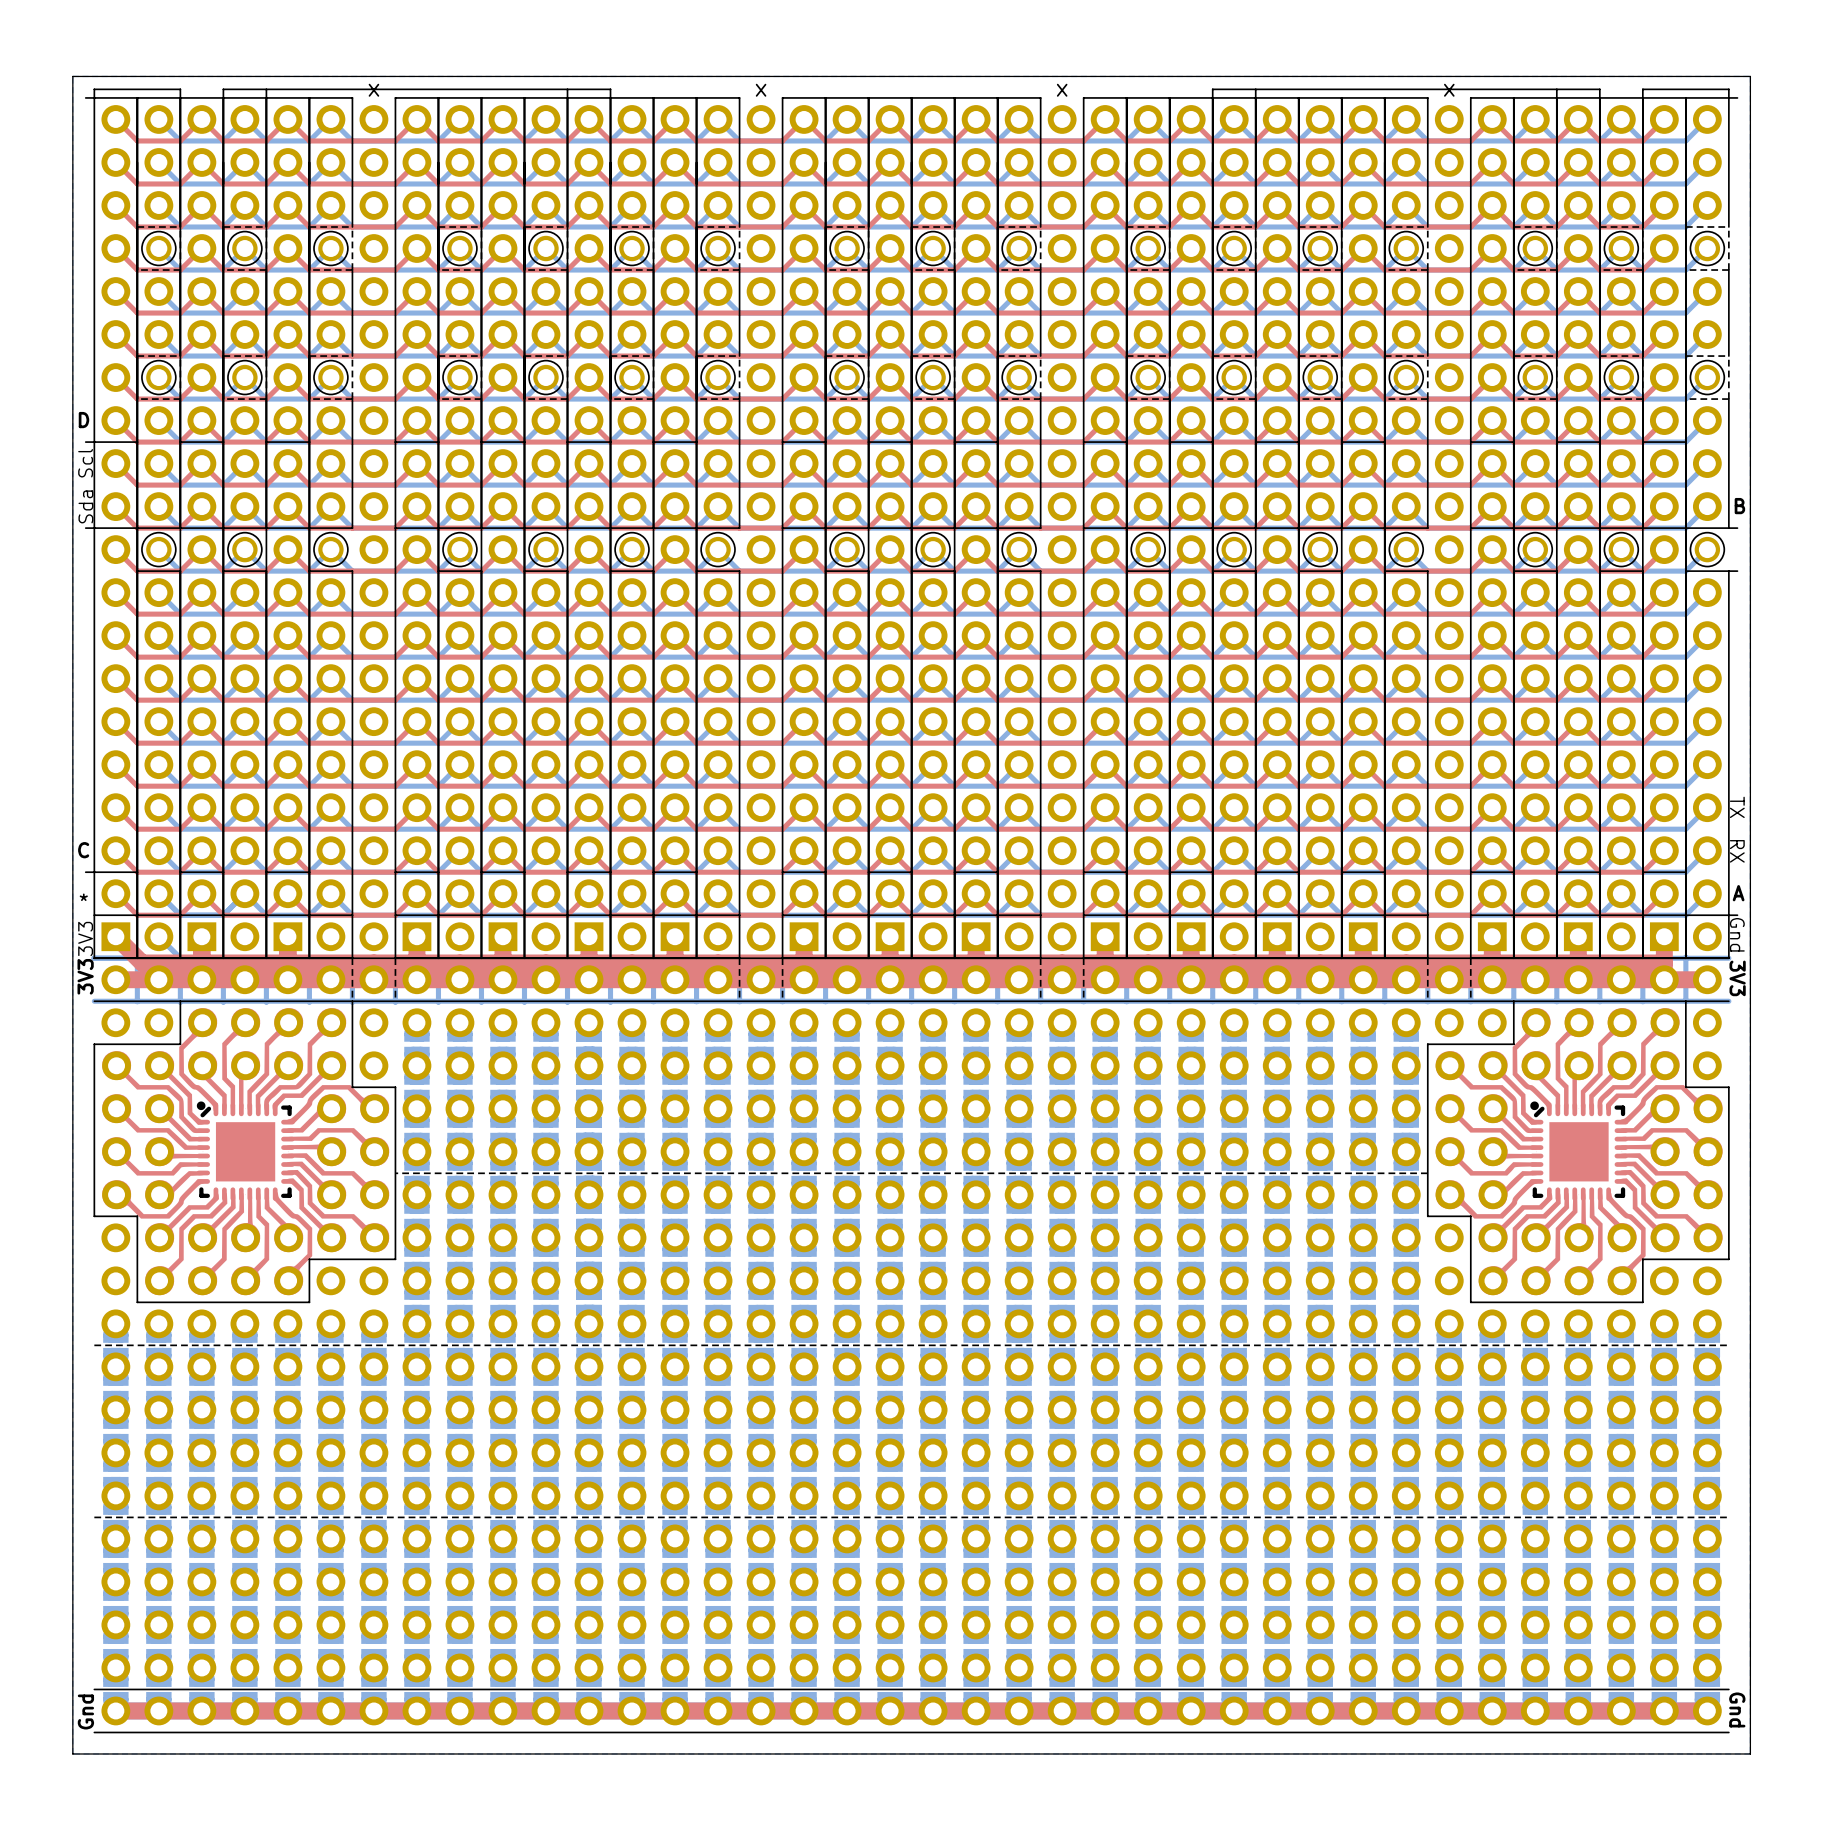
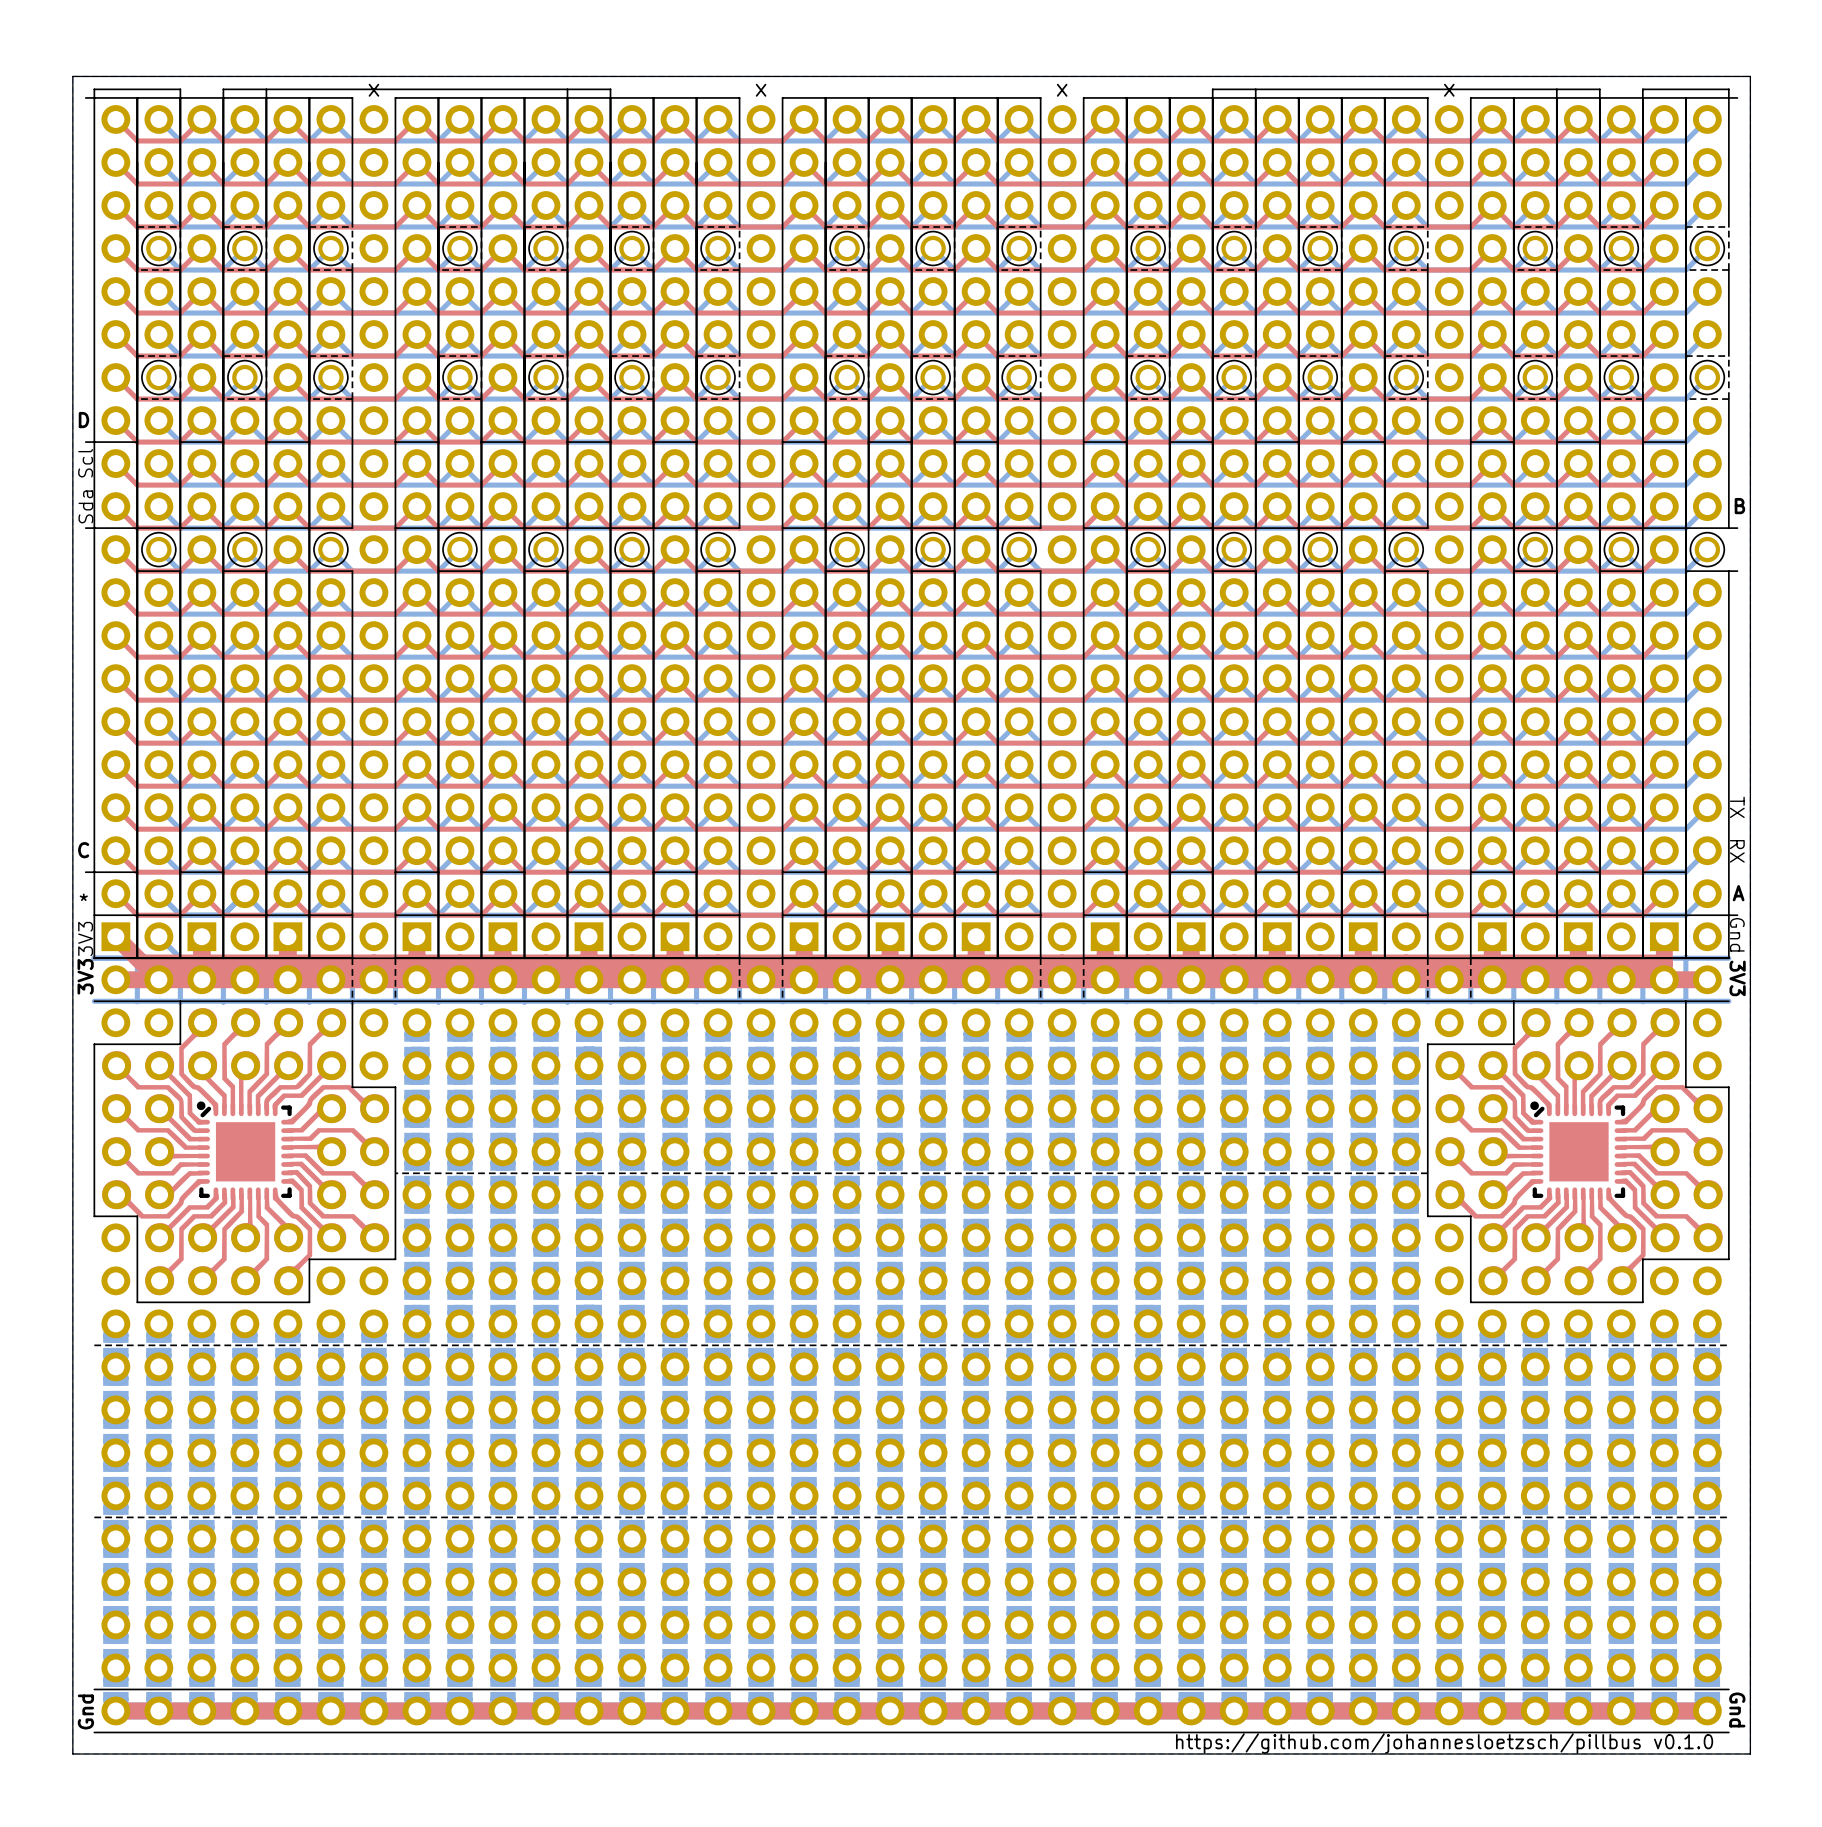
text: none -> https://github.com/johannesloetzsch/pillbus v0.1.0 (1444, 1743)

